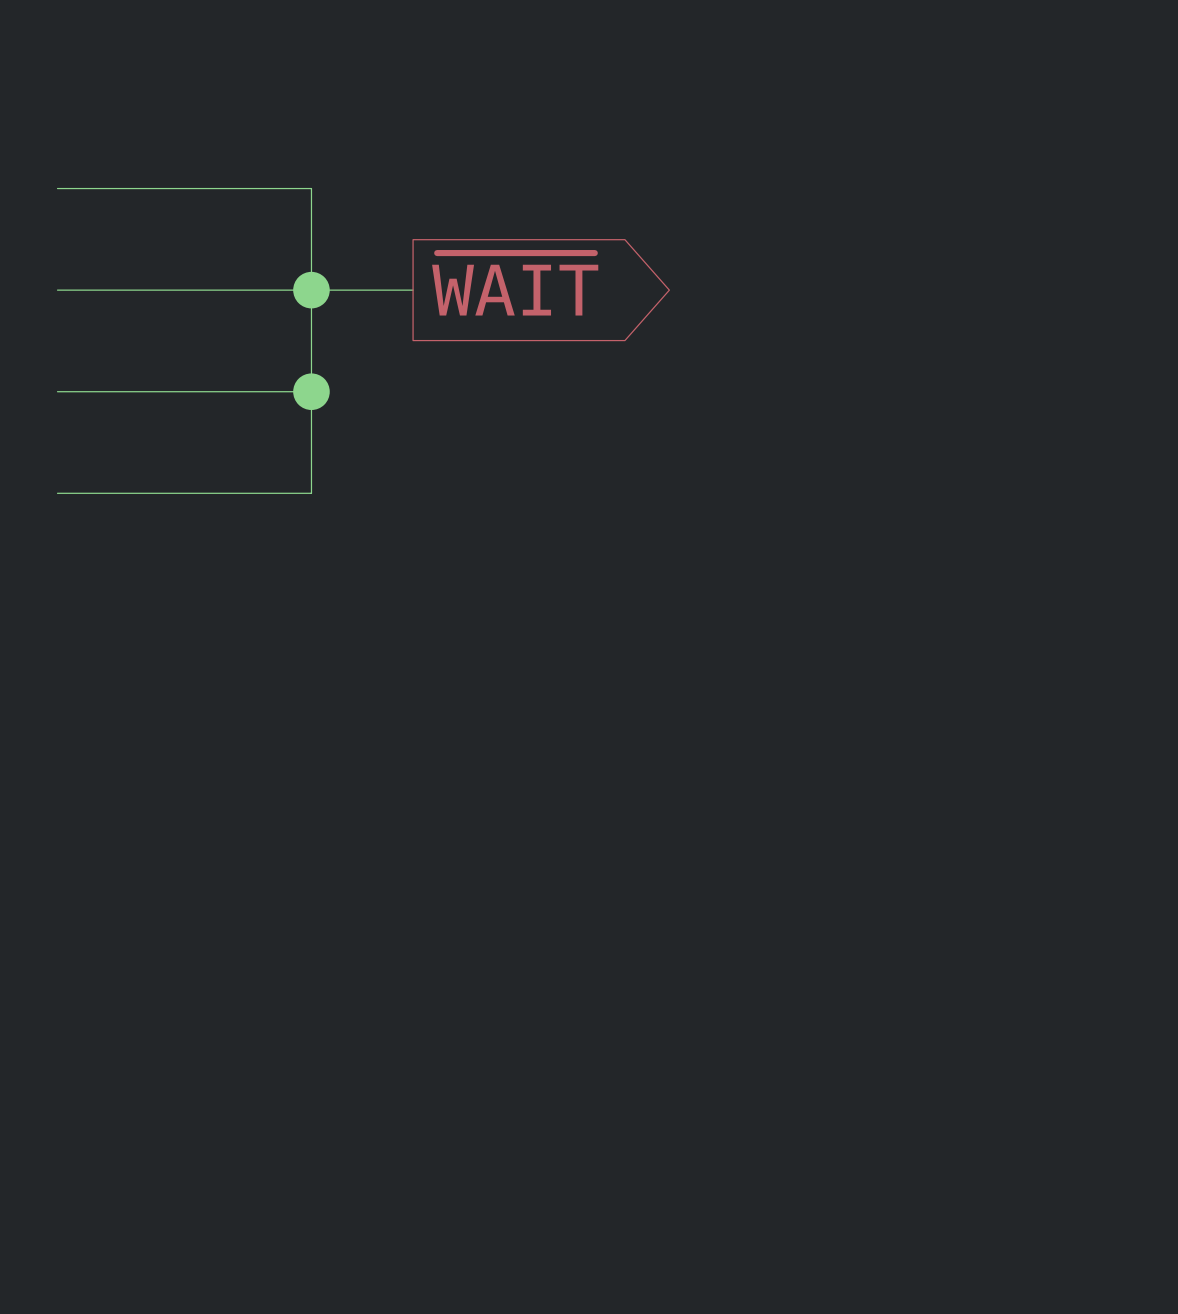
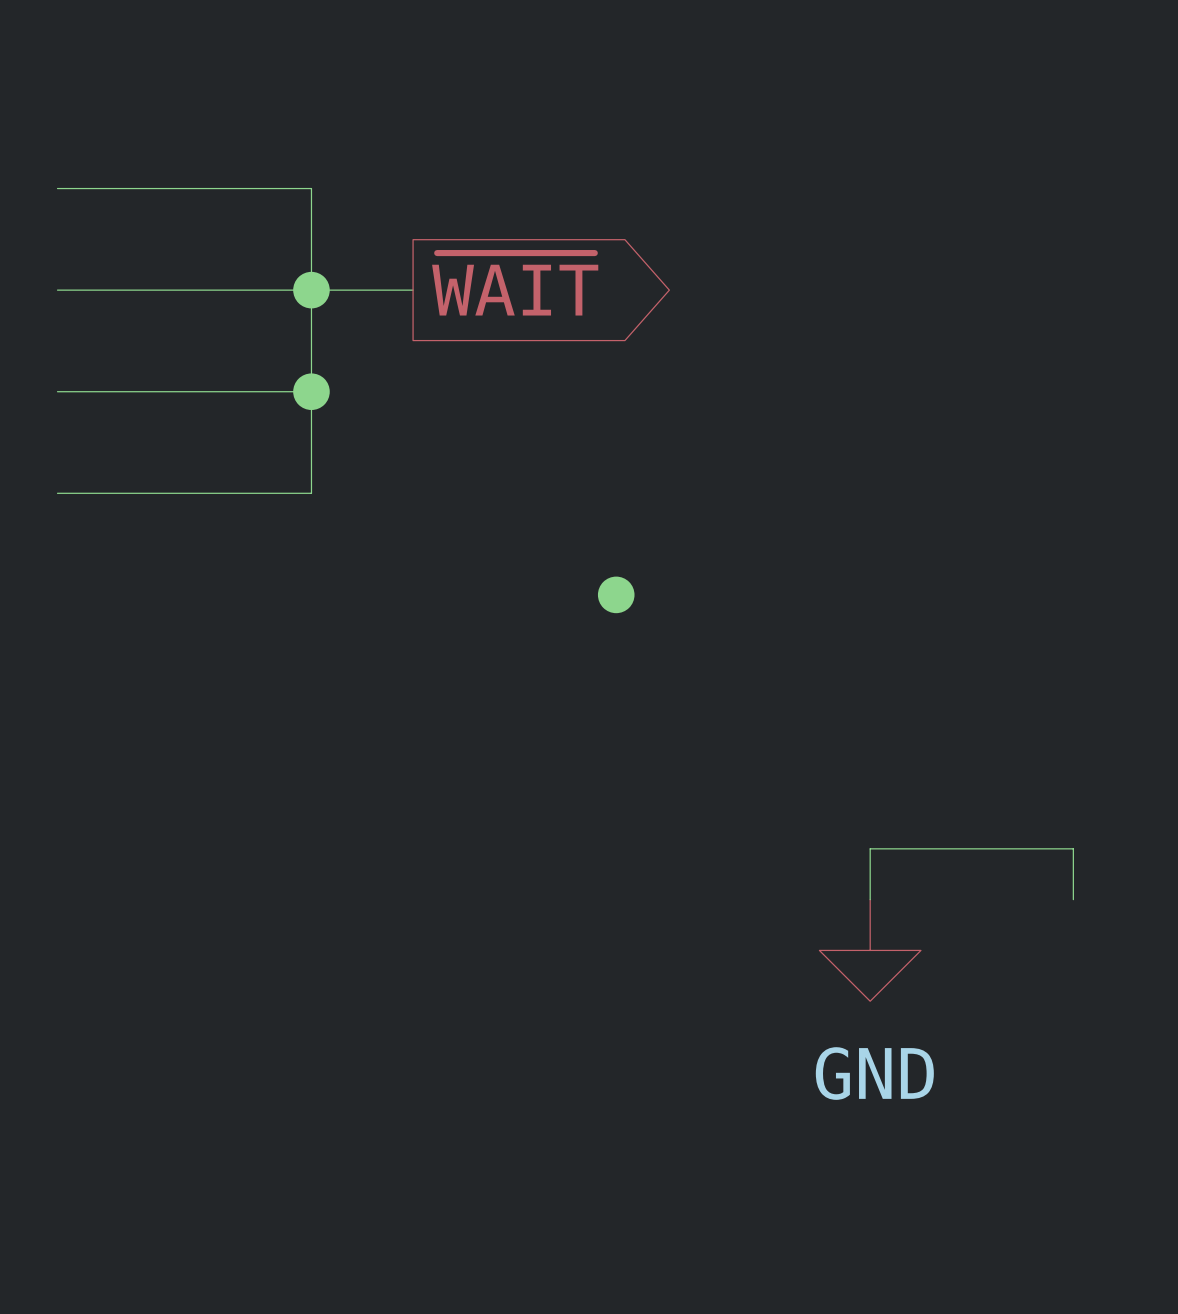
junction: none -> (616, 594)
wire: none -> (870, 899) (870, 848) (1073, 848) (1073, 899)
power symbol: none -> GND (870, 950)

